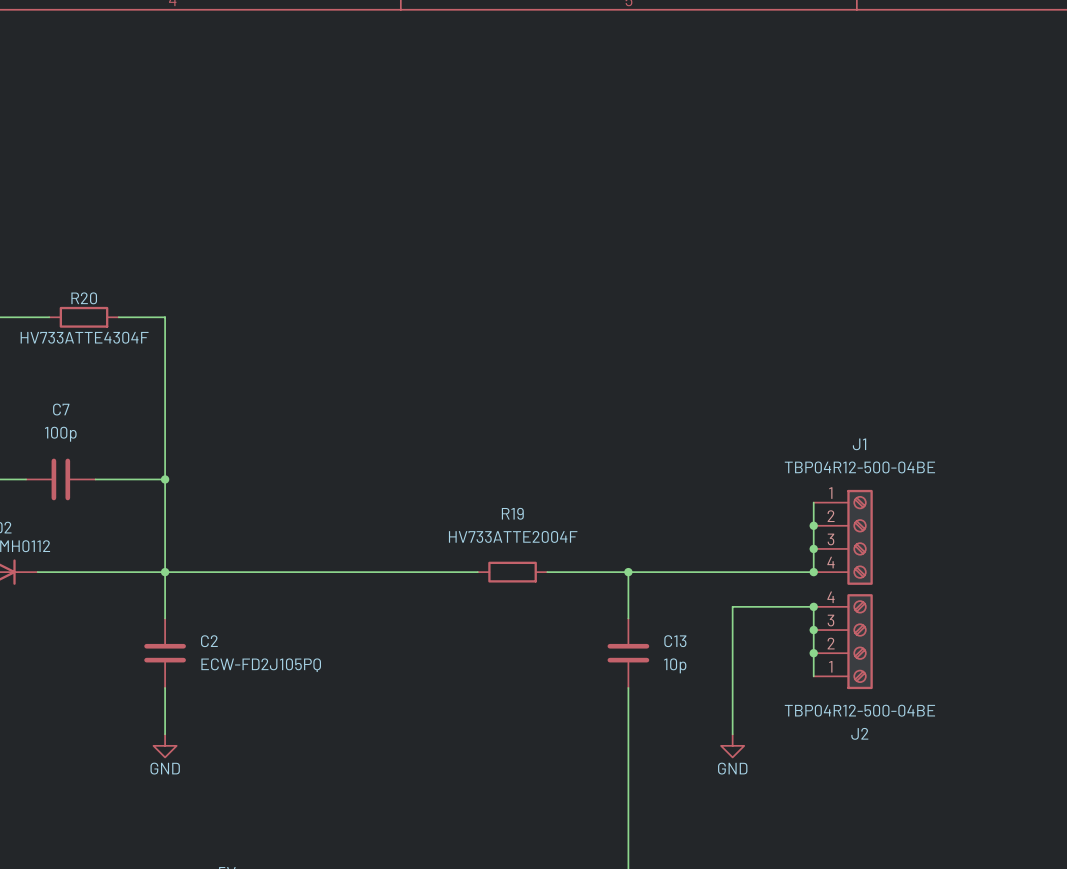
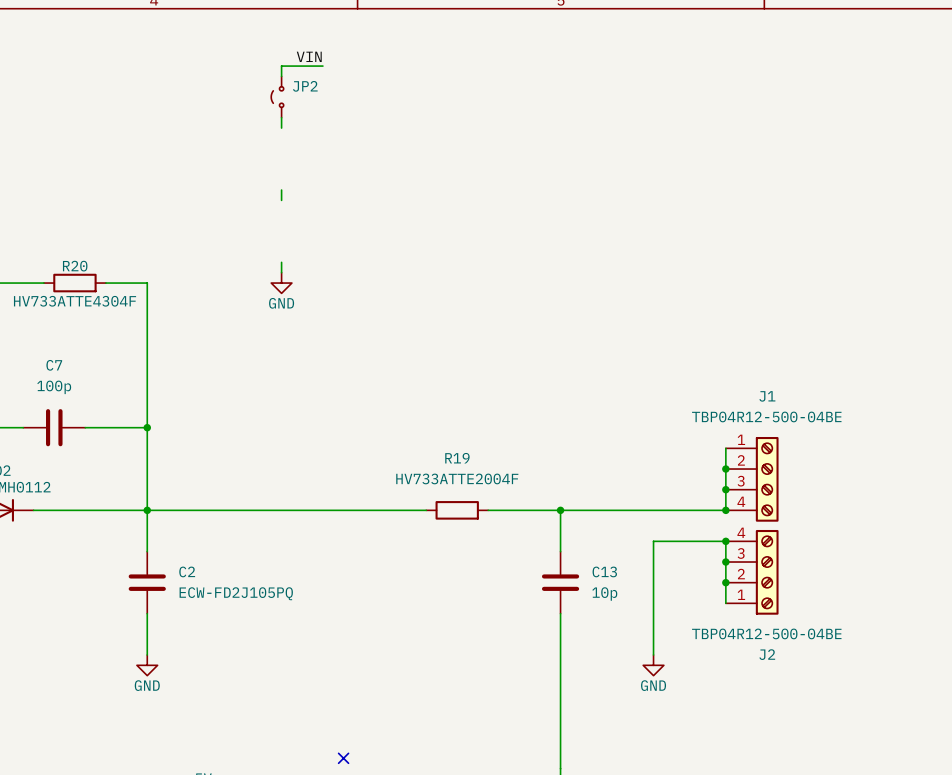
label: none -> VIN (309, 56)
wire: none -> (322, 66) (281, 66) (281, 76)
JP2: none -> (277, 97)
wire: none -> (281, 117) (281, 128)
wire: none -> (281, 190) (281, 200)
wire: none -> (281, 262) (281, 272)
power symbol: none -> GND (281, 283)
no-connect mark: none -> (343, 758)

